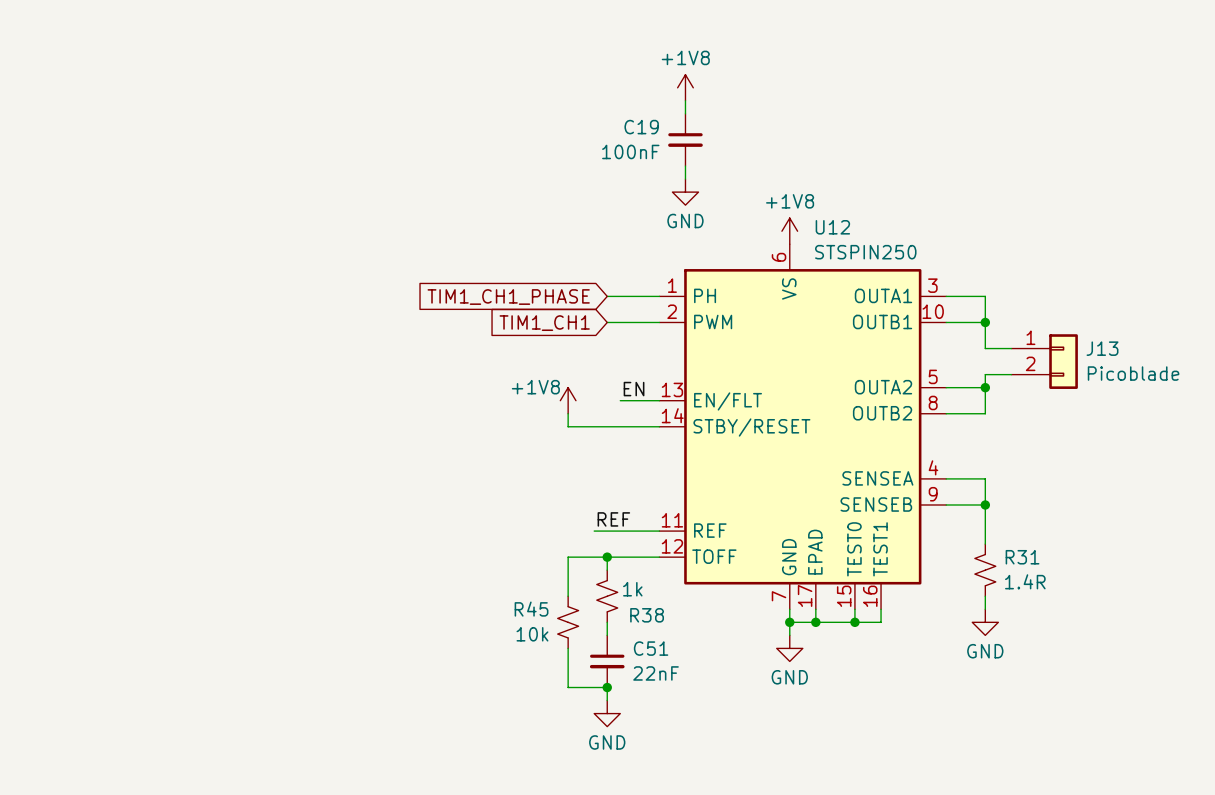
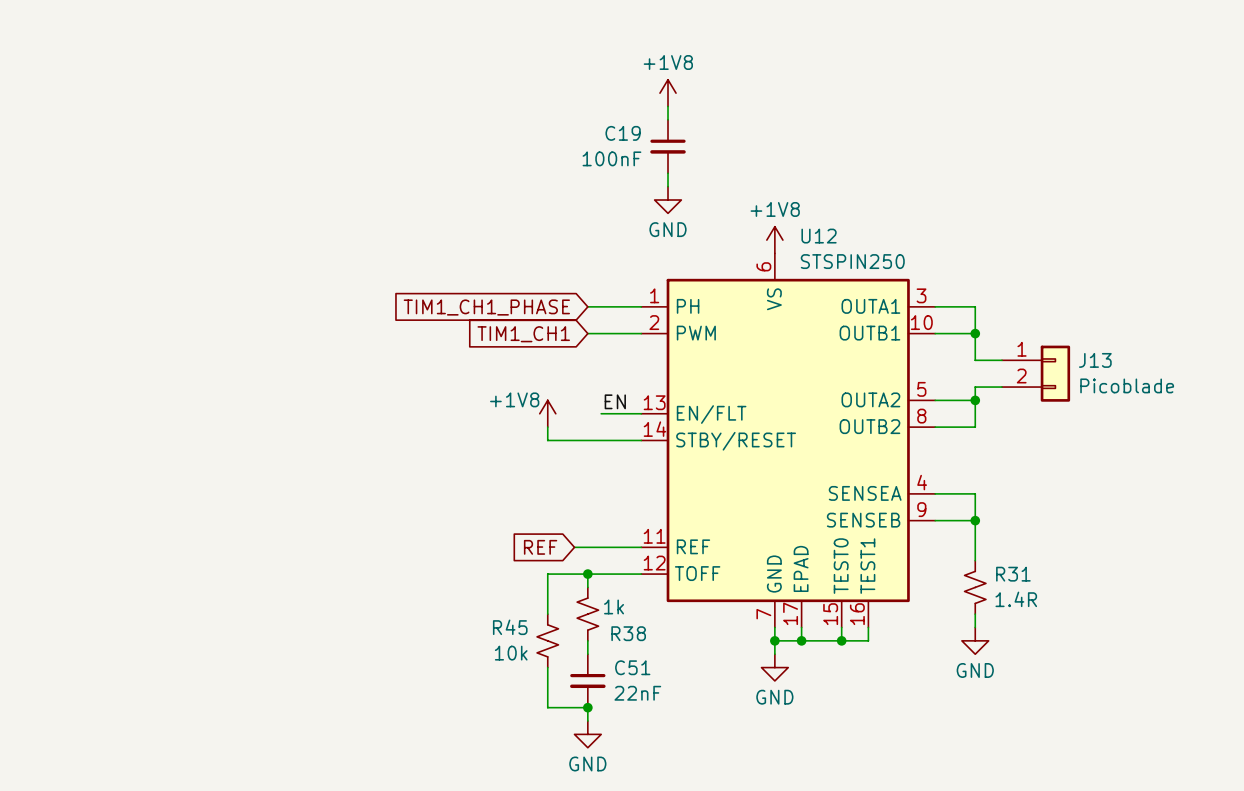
label: REF (613, 519) -> none
global label: none -> REF (540, 547)

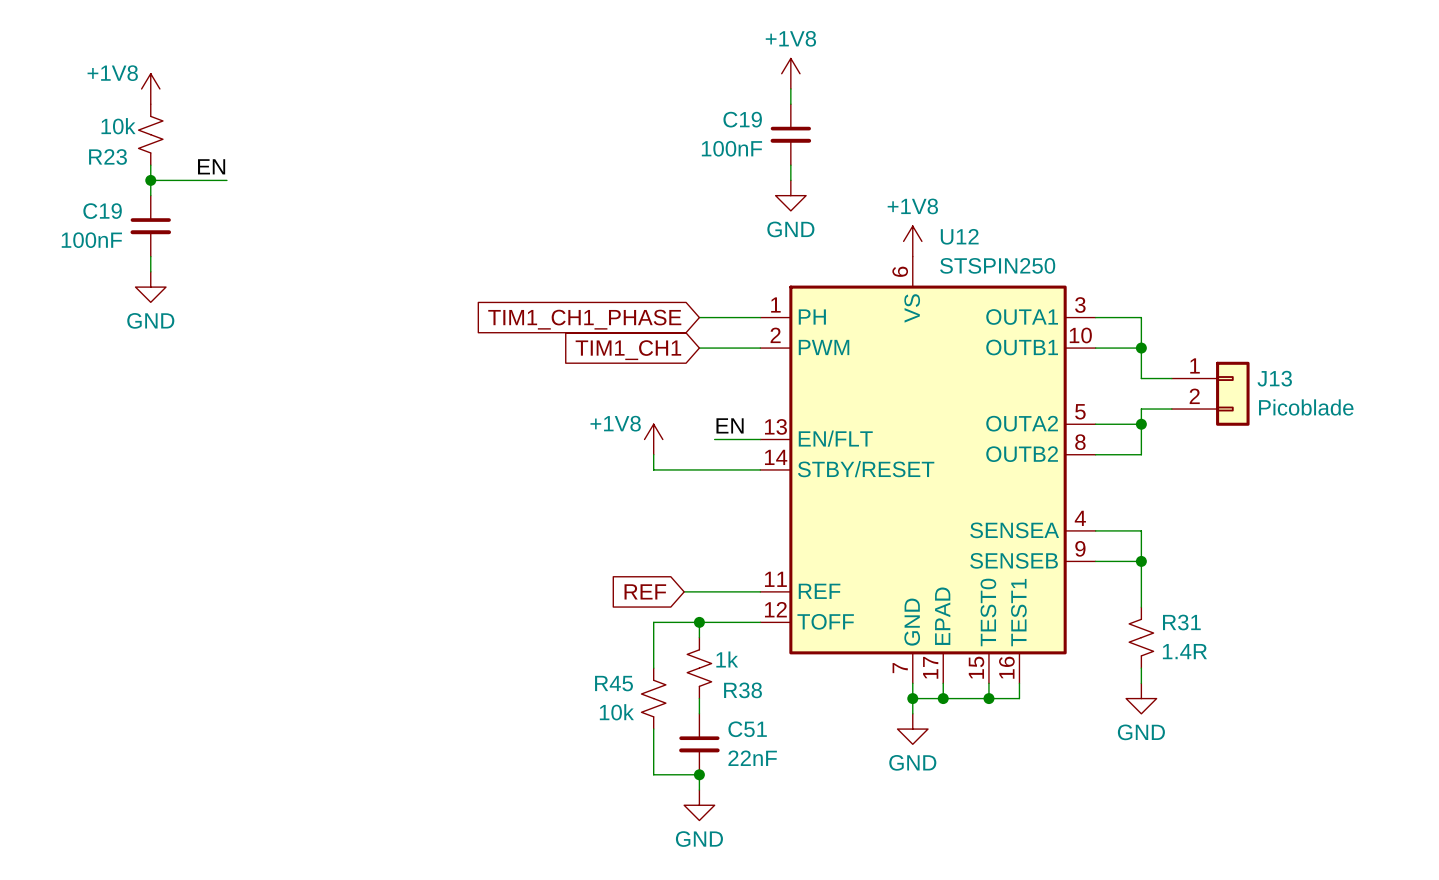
power symbol: none -> +1V8 (150, 88)
R23: none -> 10k (150, 134)
wire: none -> (150, 165) (150, 195)
label: none -> EN (211, 166)
wire: none -> (150, 180) (226, 180)
junction: none -> (150, 180)
C19: none -> 100nF (150, 226)
wire: none -> (150, 256) (150, 271)
power symbol: none -> GND (150, 287)

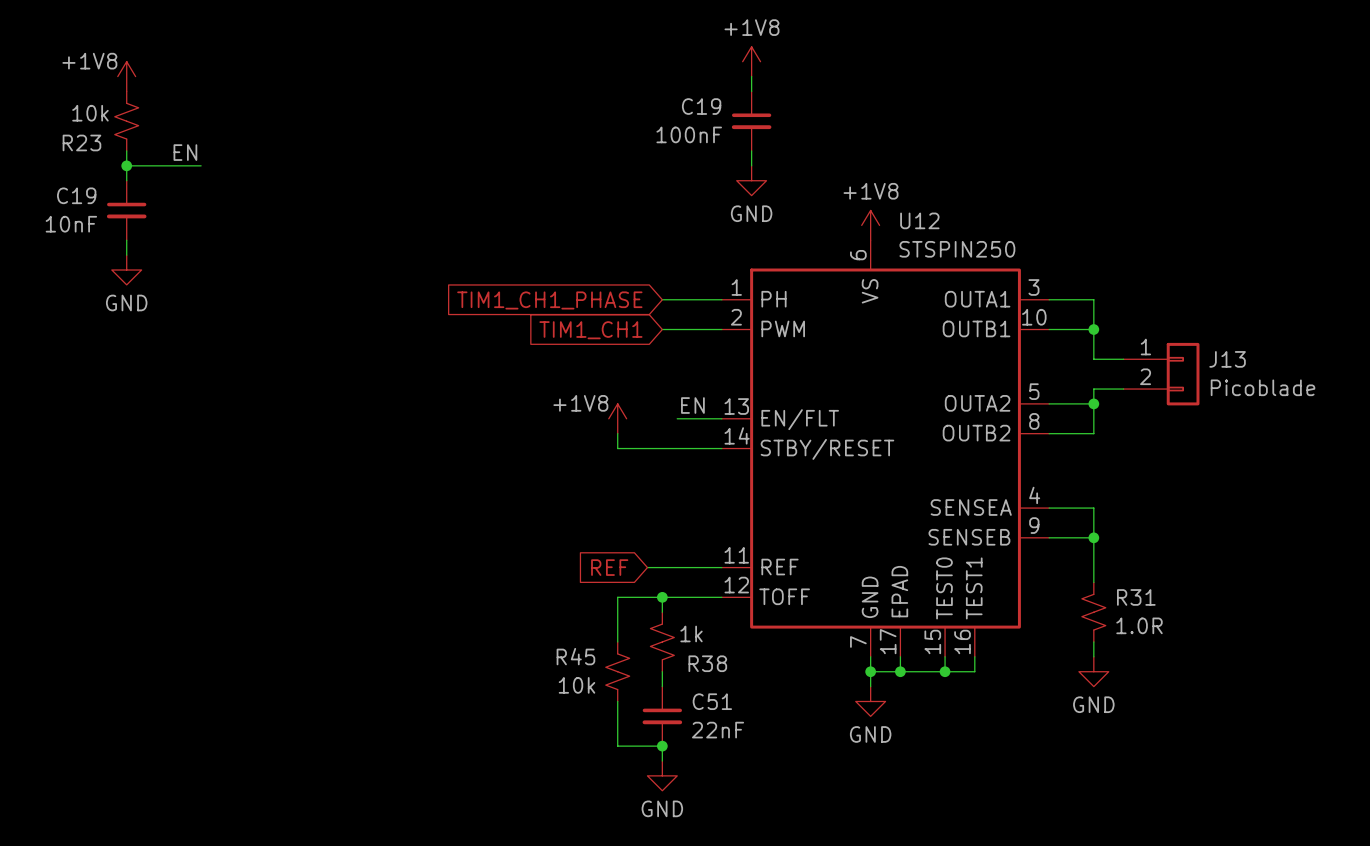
C19 value: 100nF (91, 240) -> 10nF (71, 224)
R31 value: 1.4R (1184, 651) -> 1.0R (1139, 625)

